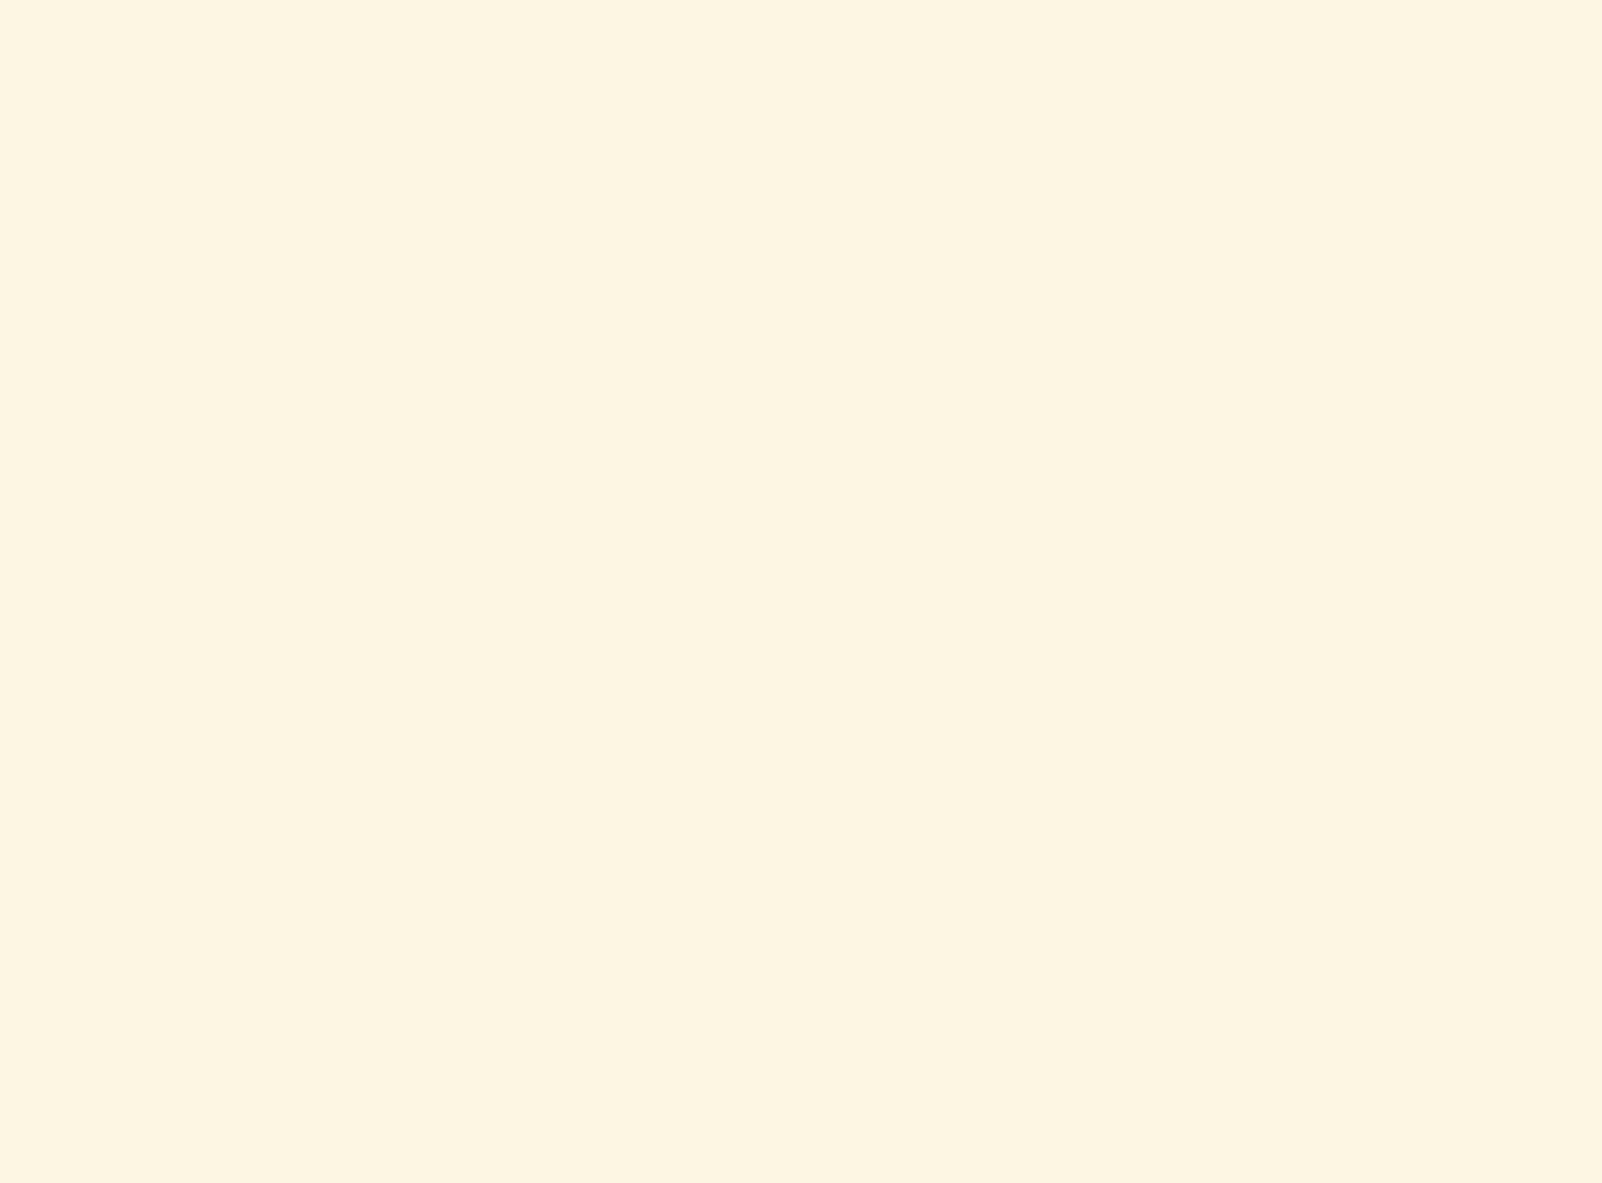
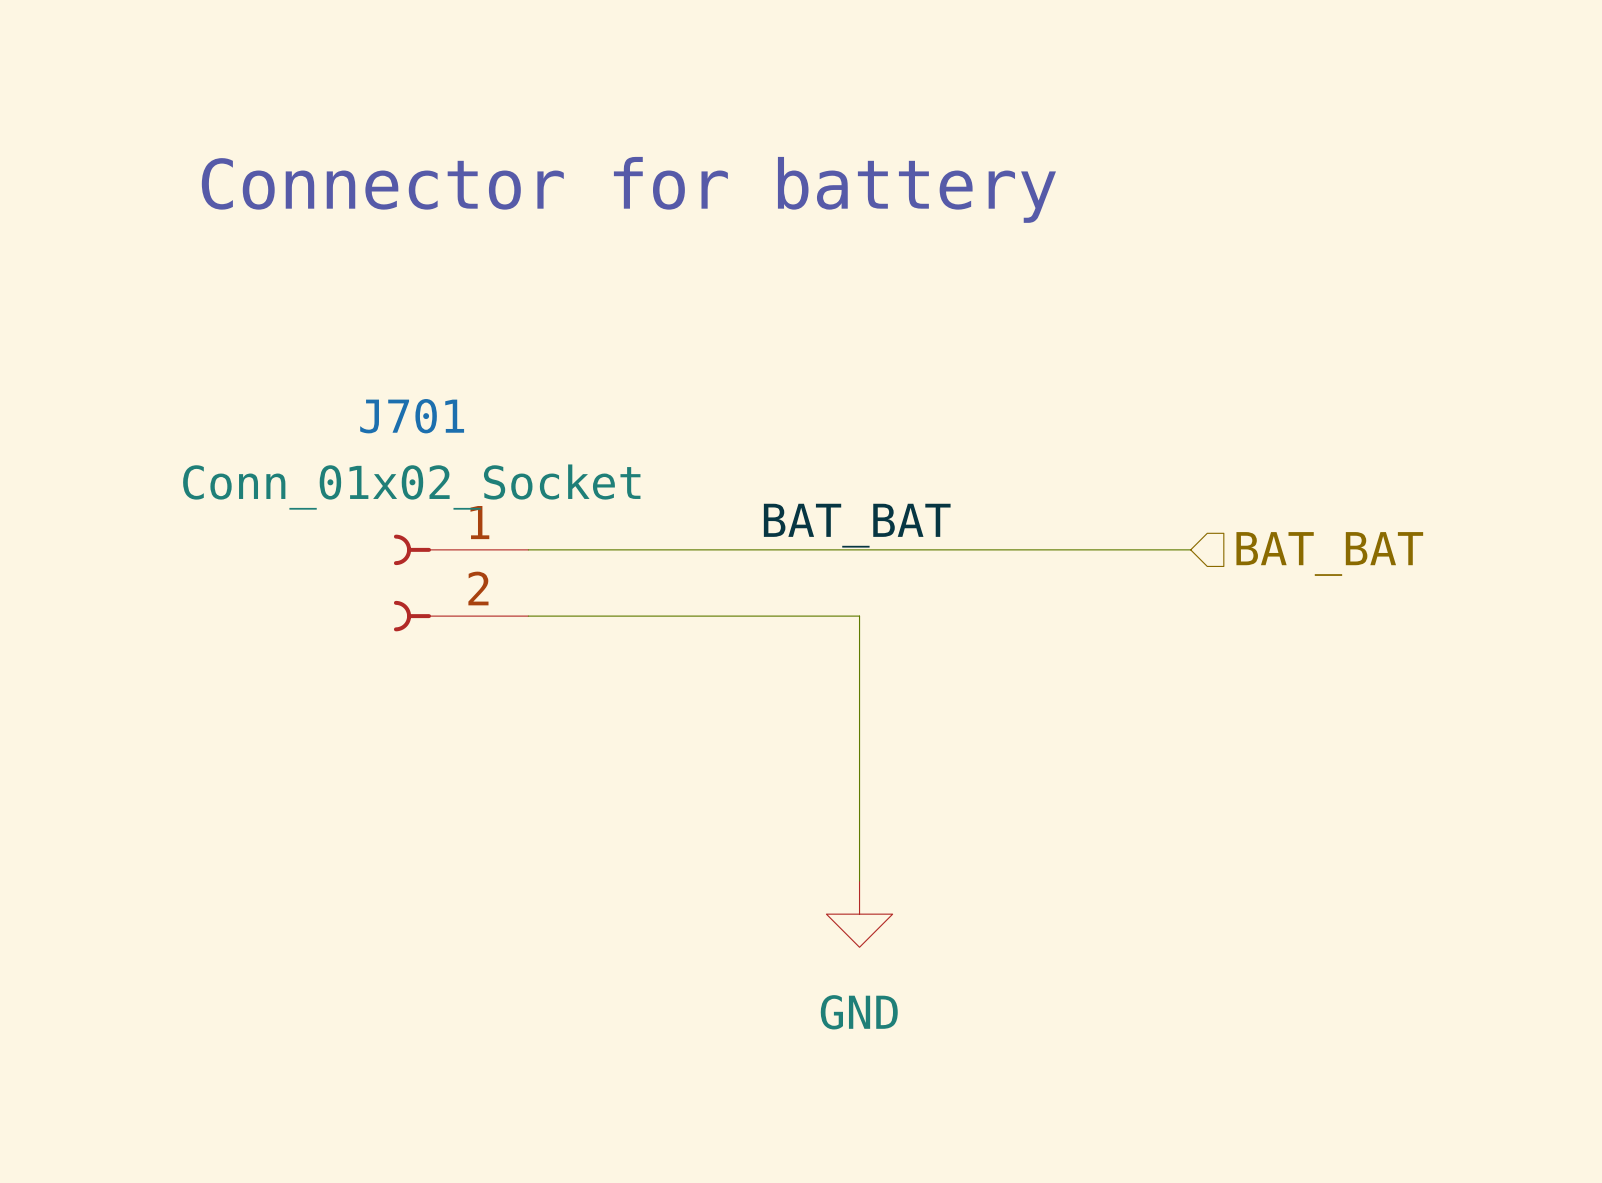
text: none -> Connector for battery (628, 189)
label: none -> BAT_BAT (857, 525)
wire: none -> (528, 549) (1190, 549)
hierarchical label: none -> BAT_BAT (1329, 553)
J701: none -> Conn_01x02_Socket (461, 582)
wire: none -> (528, 616) (859, 616) (859, 881)
power symbol: none -> GND (859, 914)

